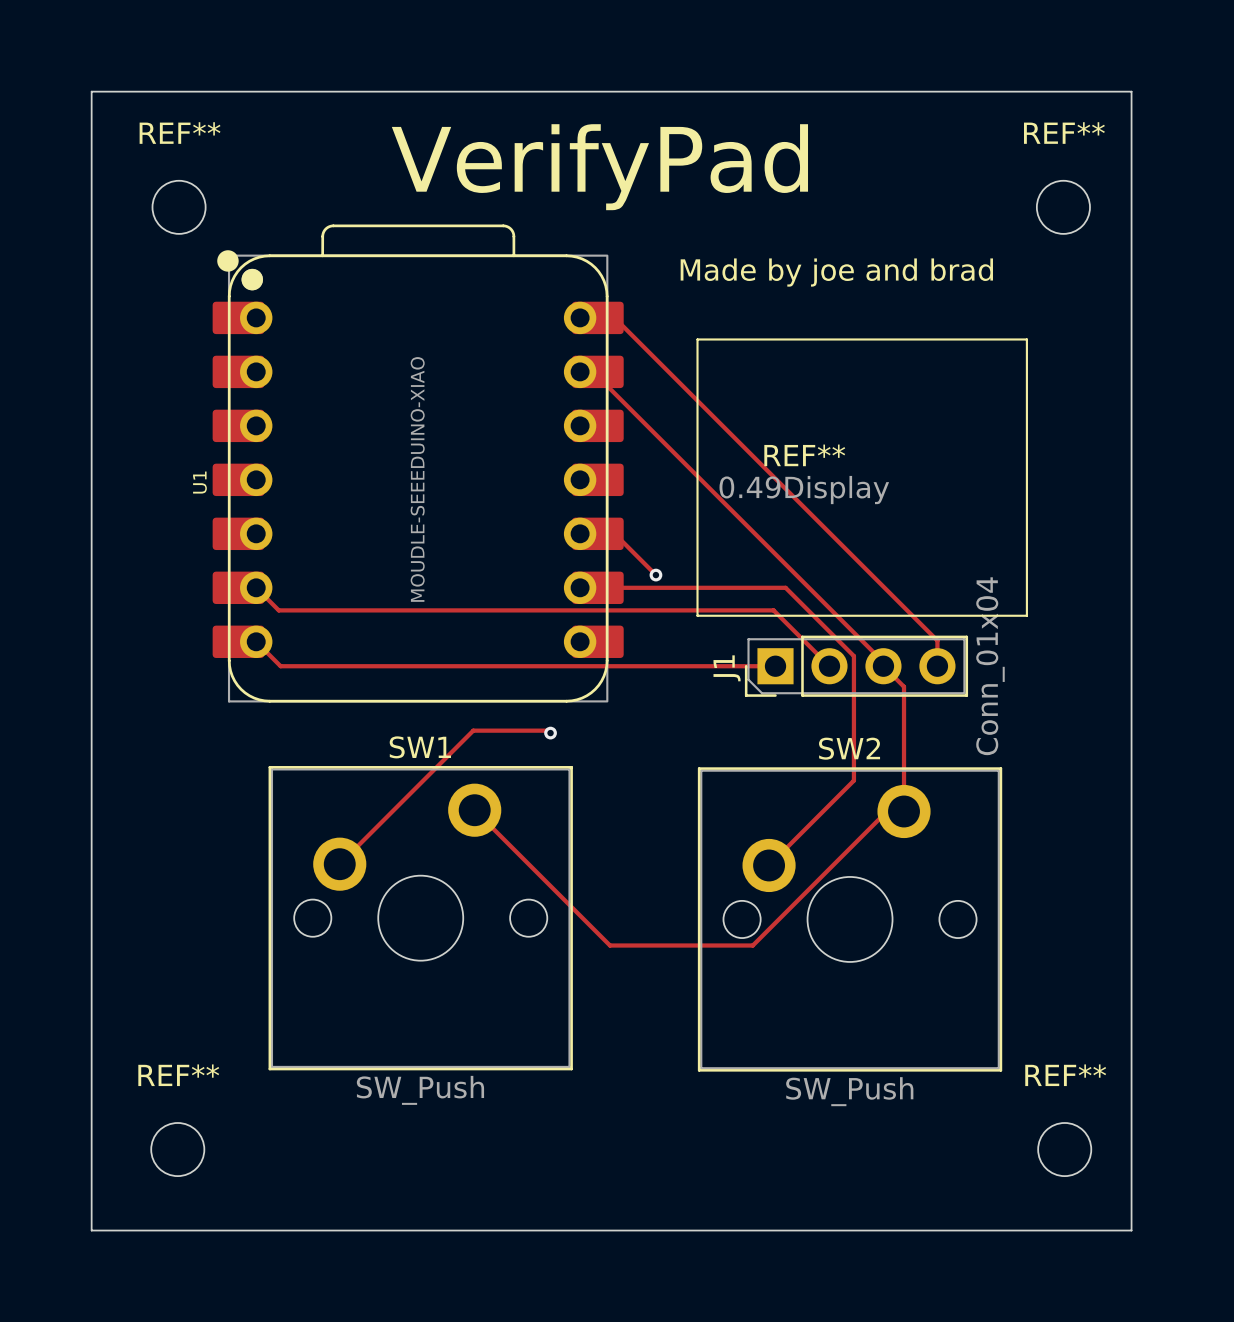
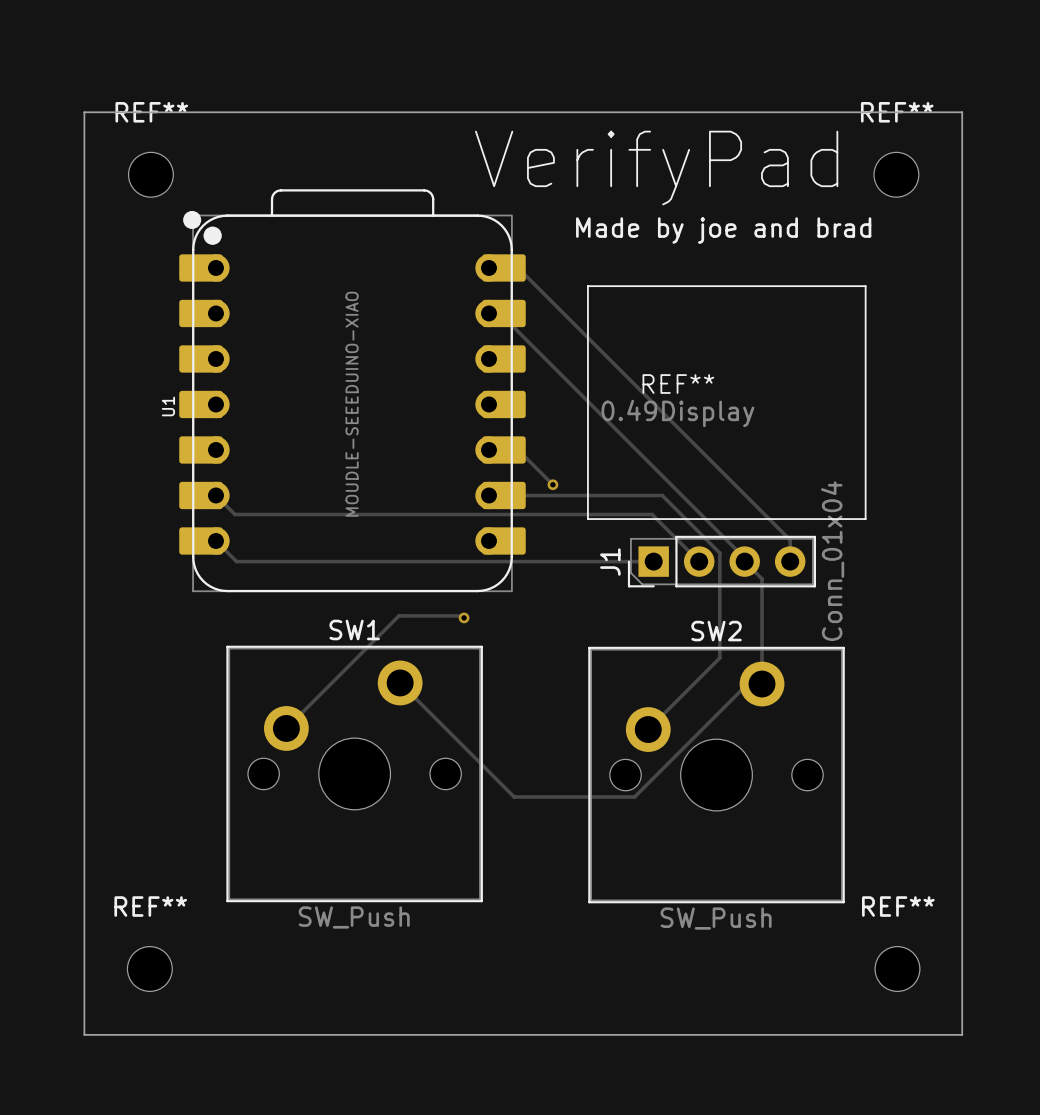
board edge: (91, 91) (1131, 91) (1131, 1230) (91, 1230) (91, 91) -> (84, 112) (84, 1034) (962, 1034) (962, 112) (84, 112)
text position: VerifyPad (599, 167) -> VerifyPad (656, 168)

